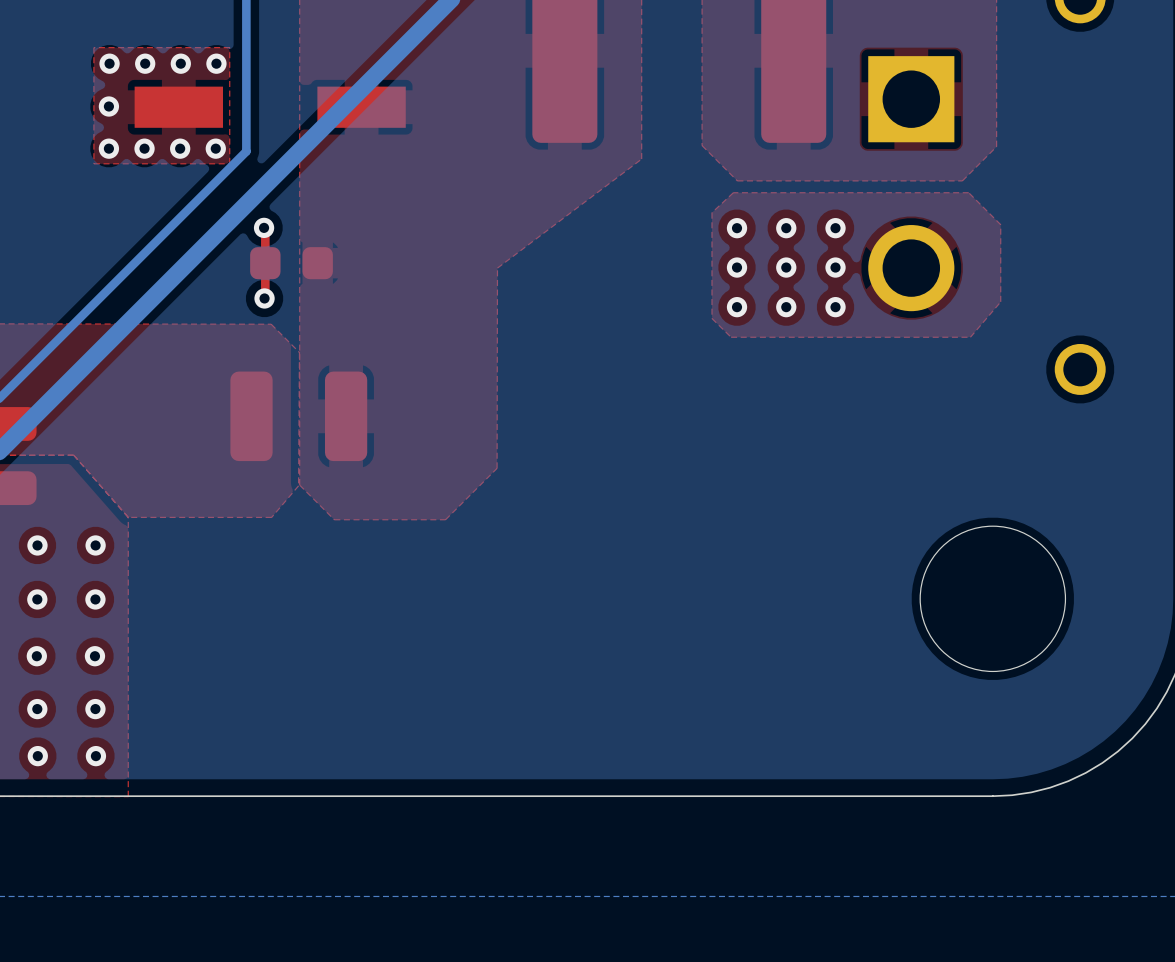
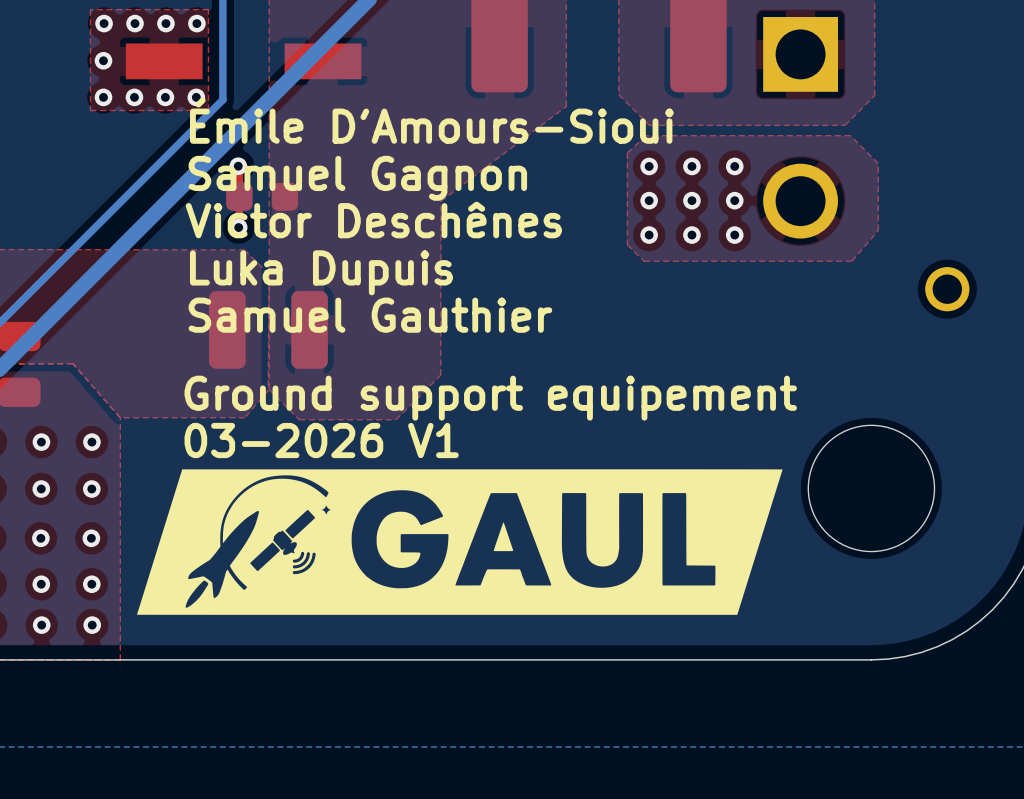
text: none -> Émile D'Amours-Sioui (431, 120)
text: none -> Samuel Gagnon (357, 178)
text: none -> Victor Deschênes (373, 219)
text: none -> Luka Dupuis (321, 272)
text: none -> Samuel Gauthier (370, 315)
text: none -> Ground support equipement (490, 398)
text: none -> 03-2026 V1 (321, 440)
drawing: none -> [136, 469, 783, 615]

